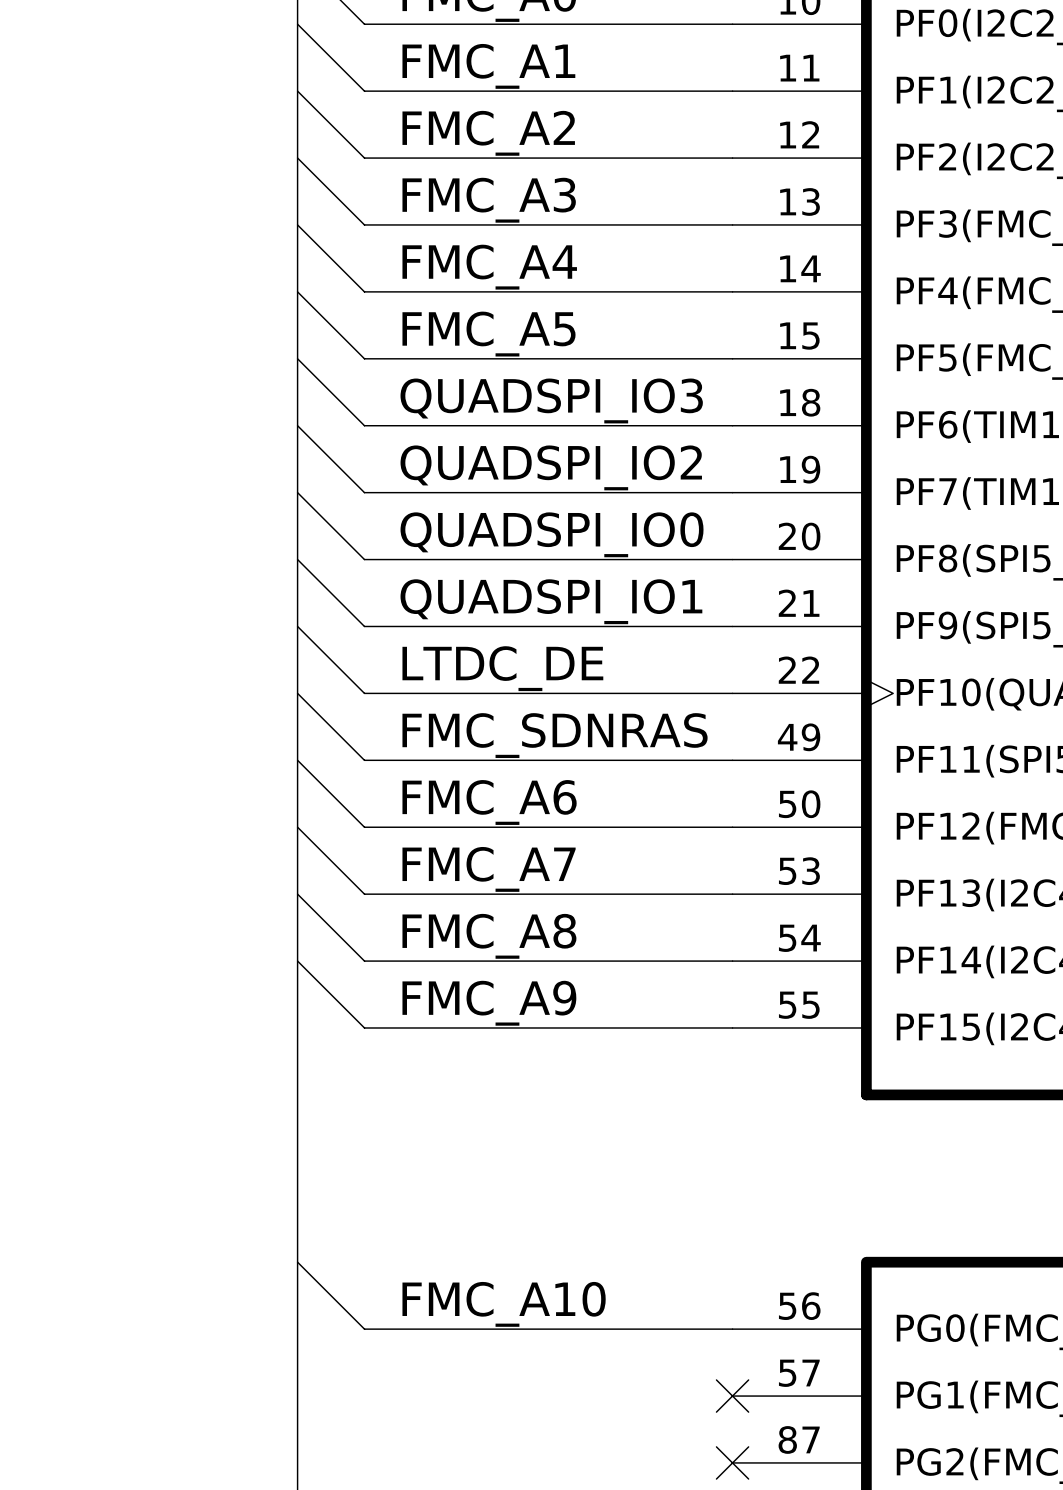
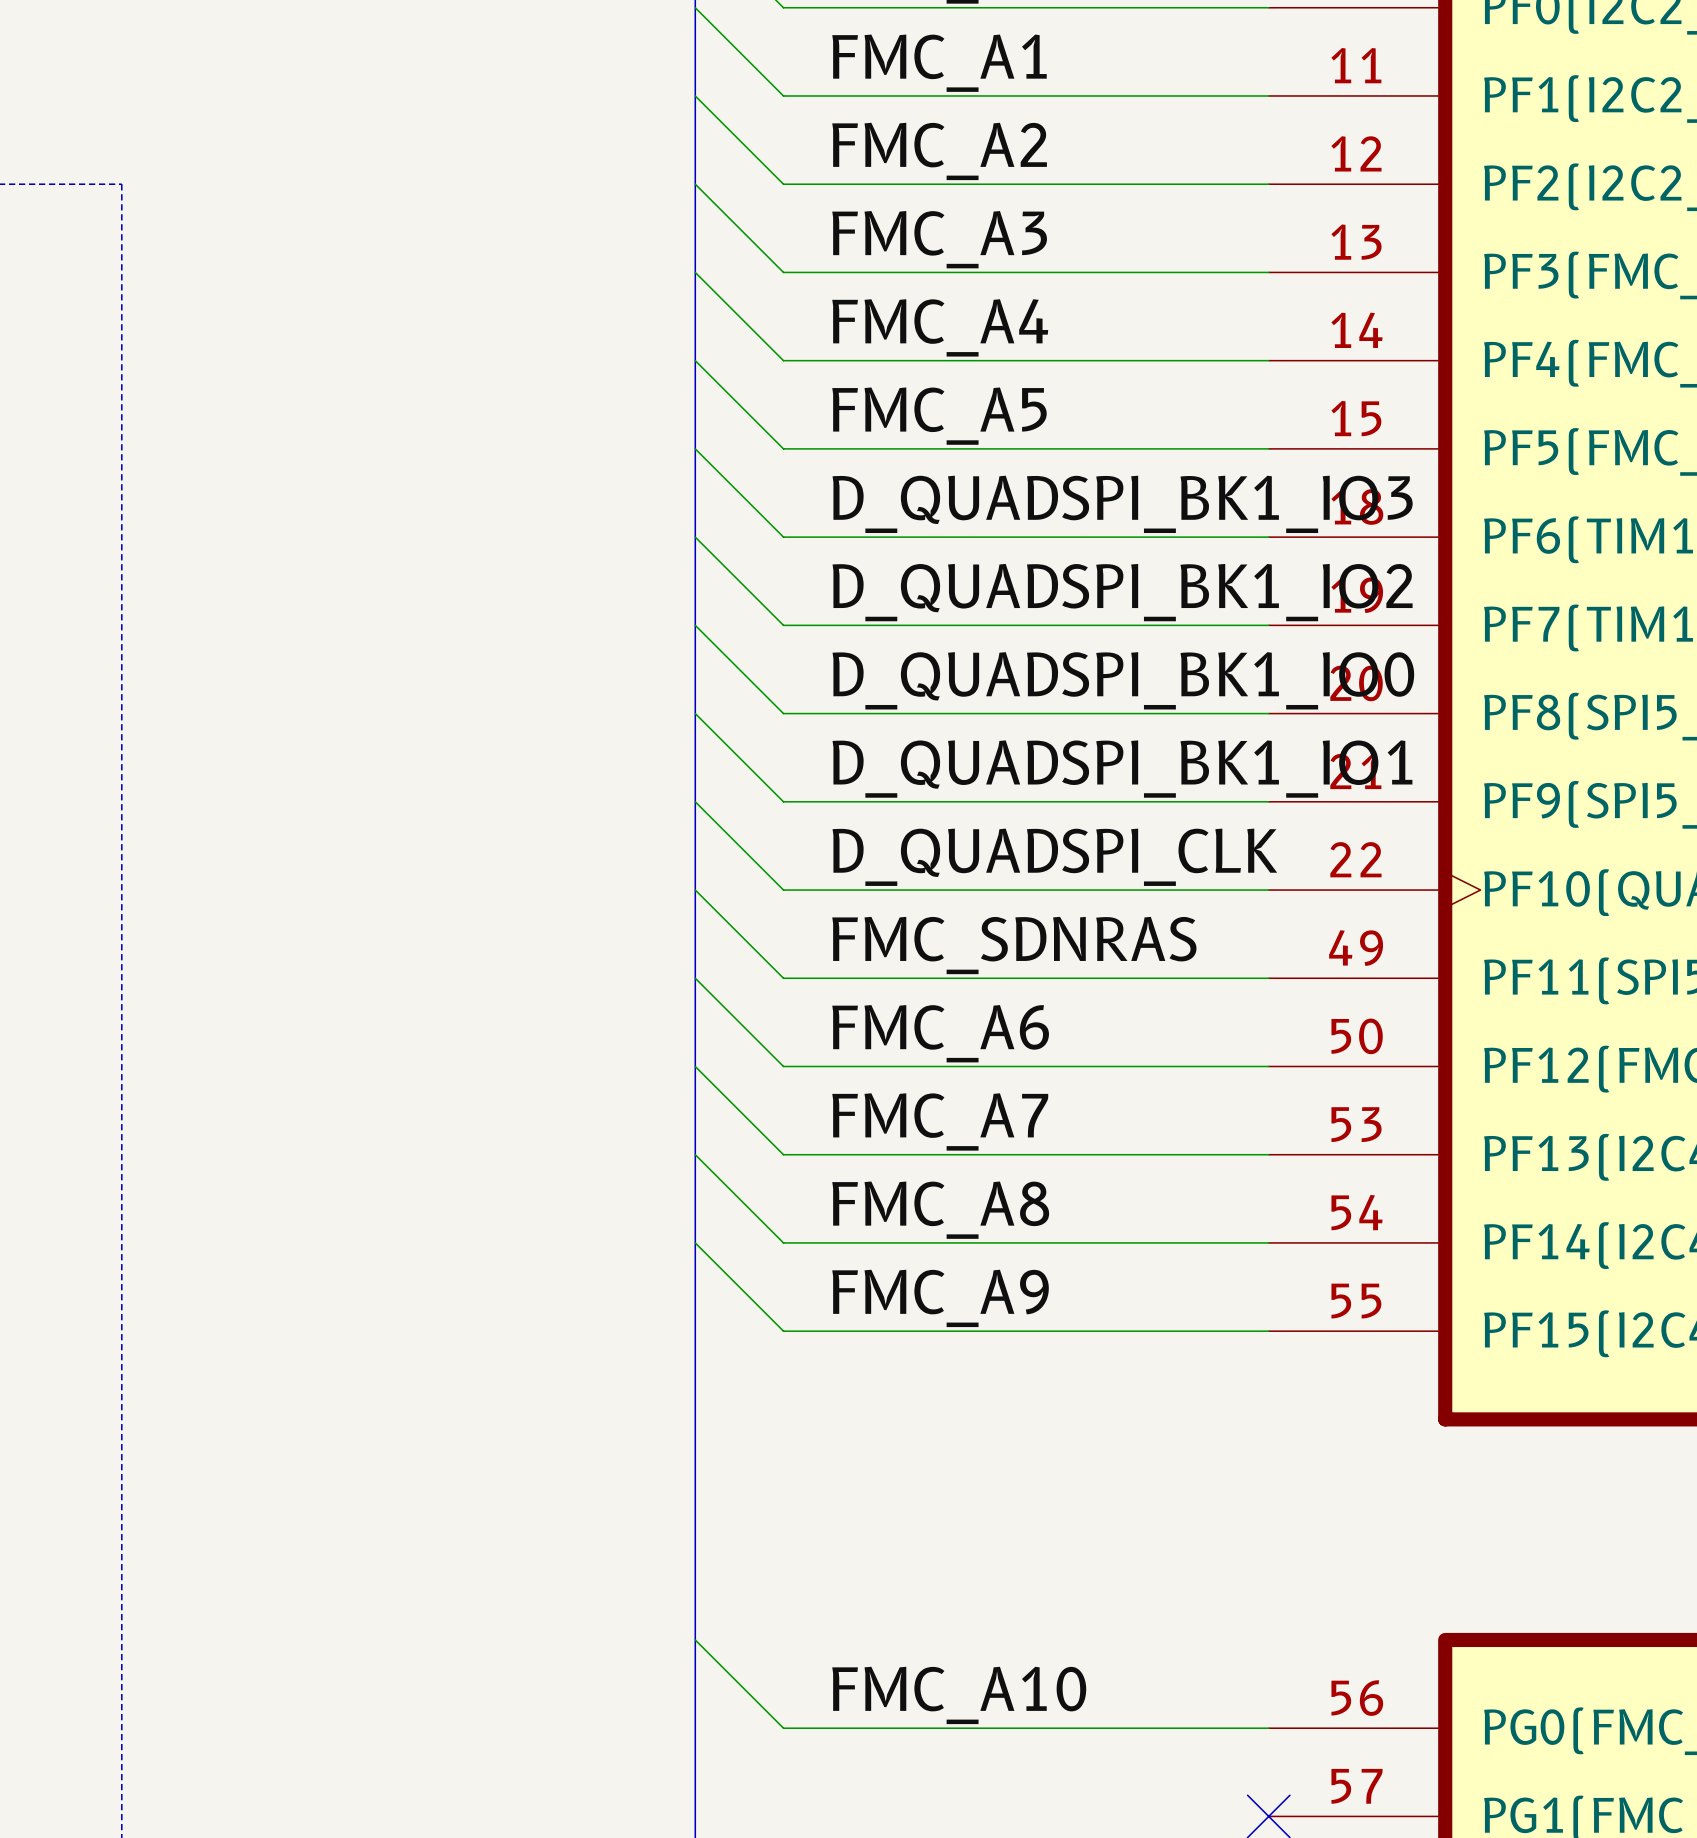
label: QUADSPI_IO3 (551, 400) -> D_QUADSPI_BK1_IO3 (1122, 504)
label: QUADSPI_IO2 (551, 467) -> D_QUADSPI_BK1_IO2 (1122, 592)
label: QUADSPI_IO0 (552, 534) -> D_QUADSPI_BK1_IO0 (1123, 680)
label: QUADSPI_IO1 (551, 601) -> D_QUADSPI_BK1_IO1 (1122, 769)
label: LTDC_DE (502, 668) -> D_QUADSPI_CLK (1054, 857)

